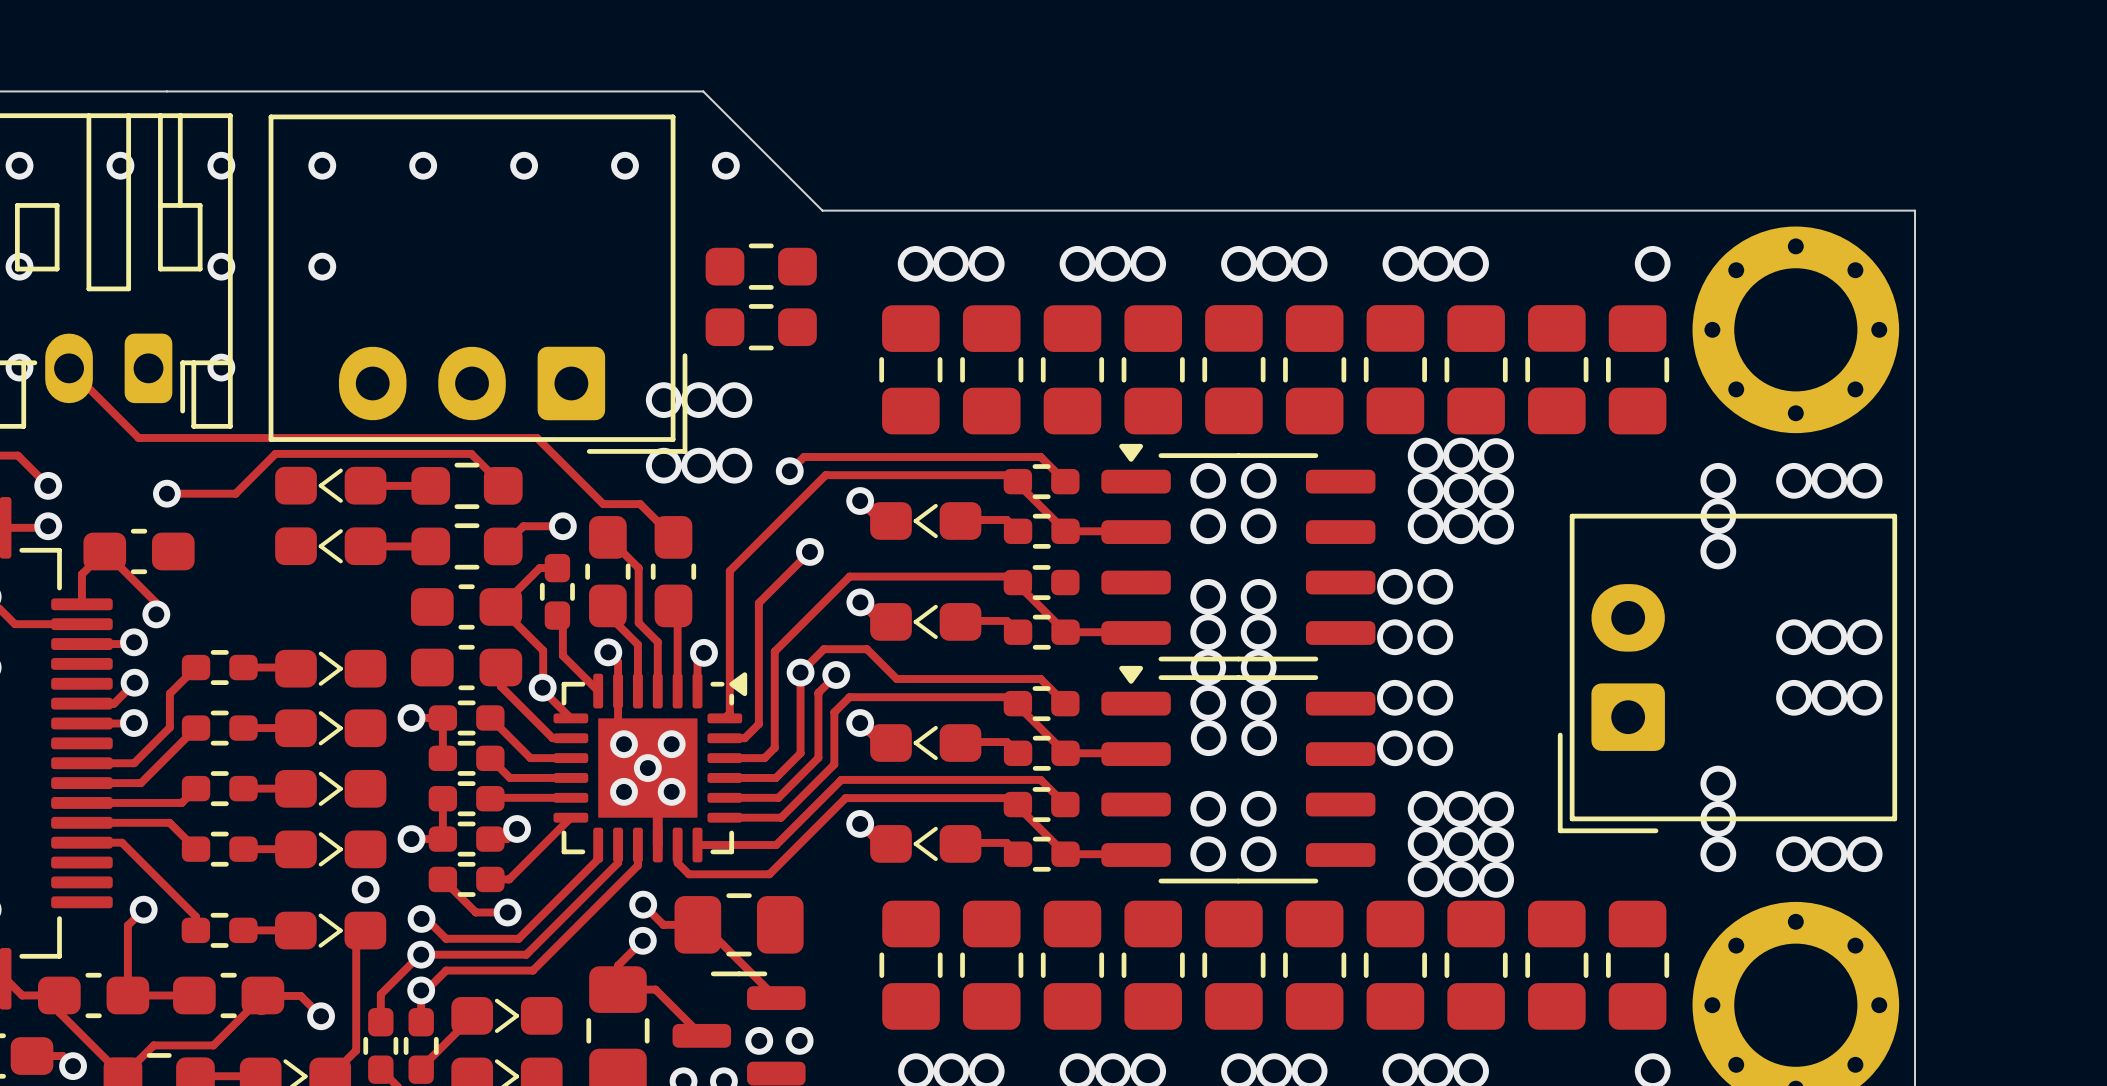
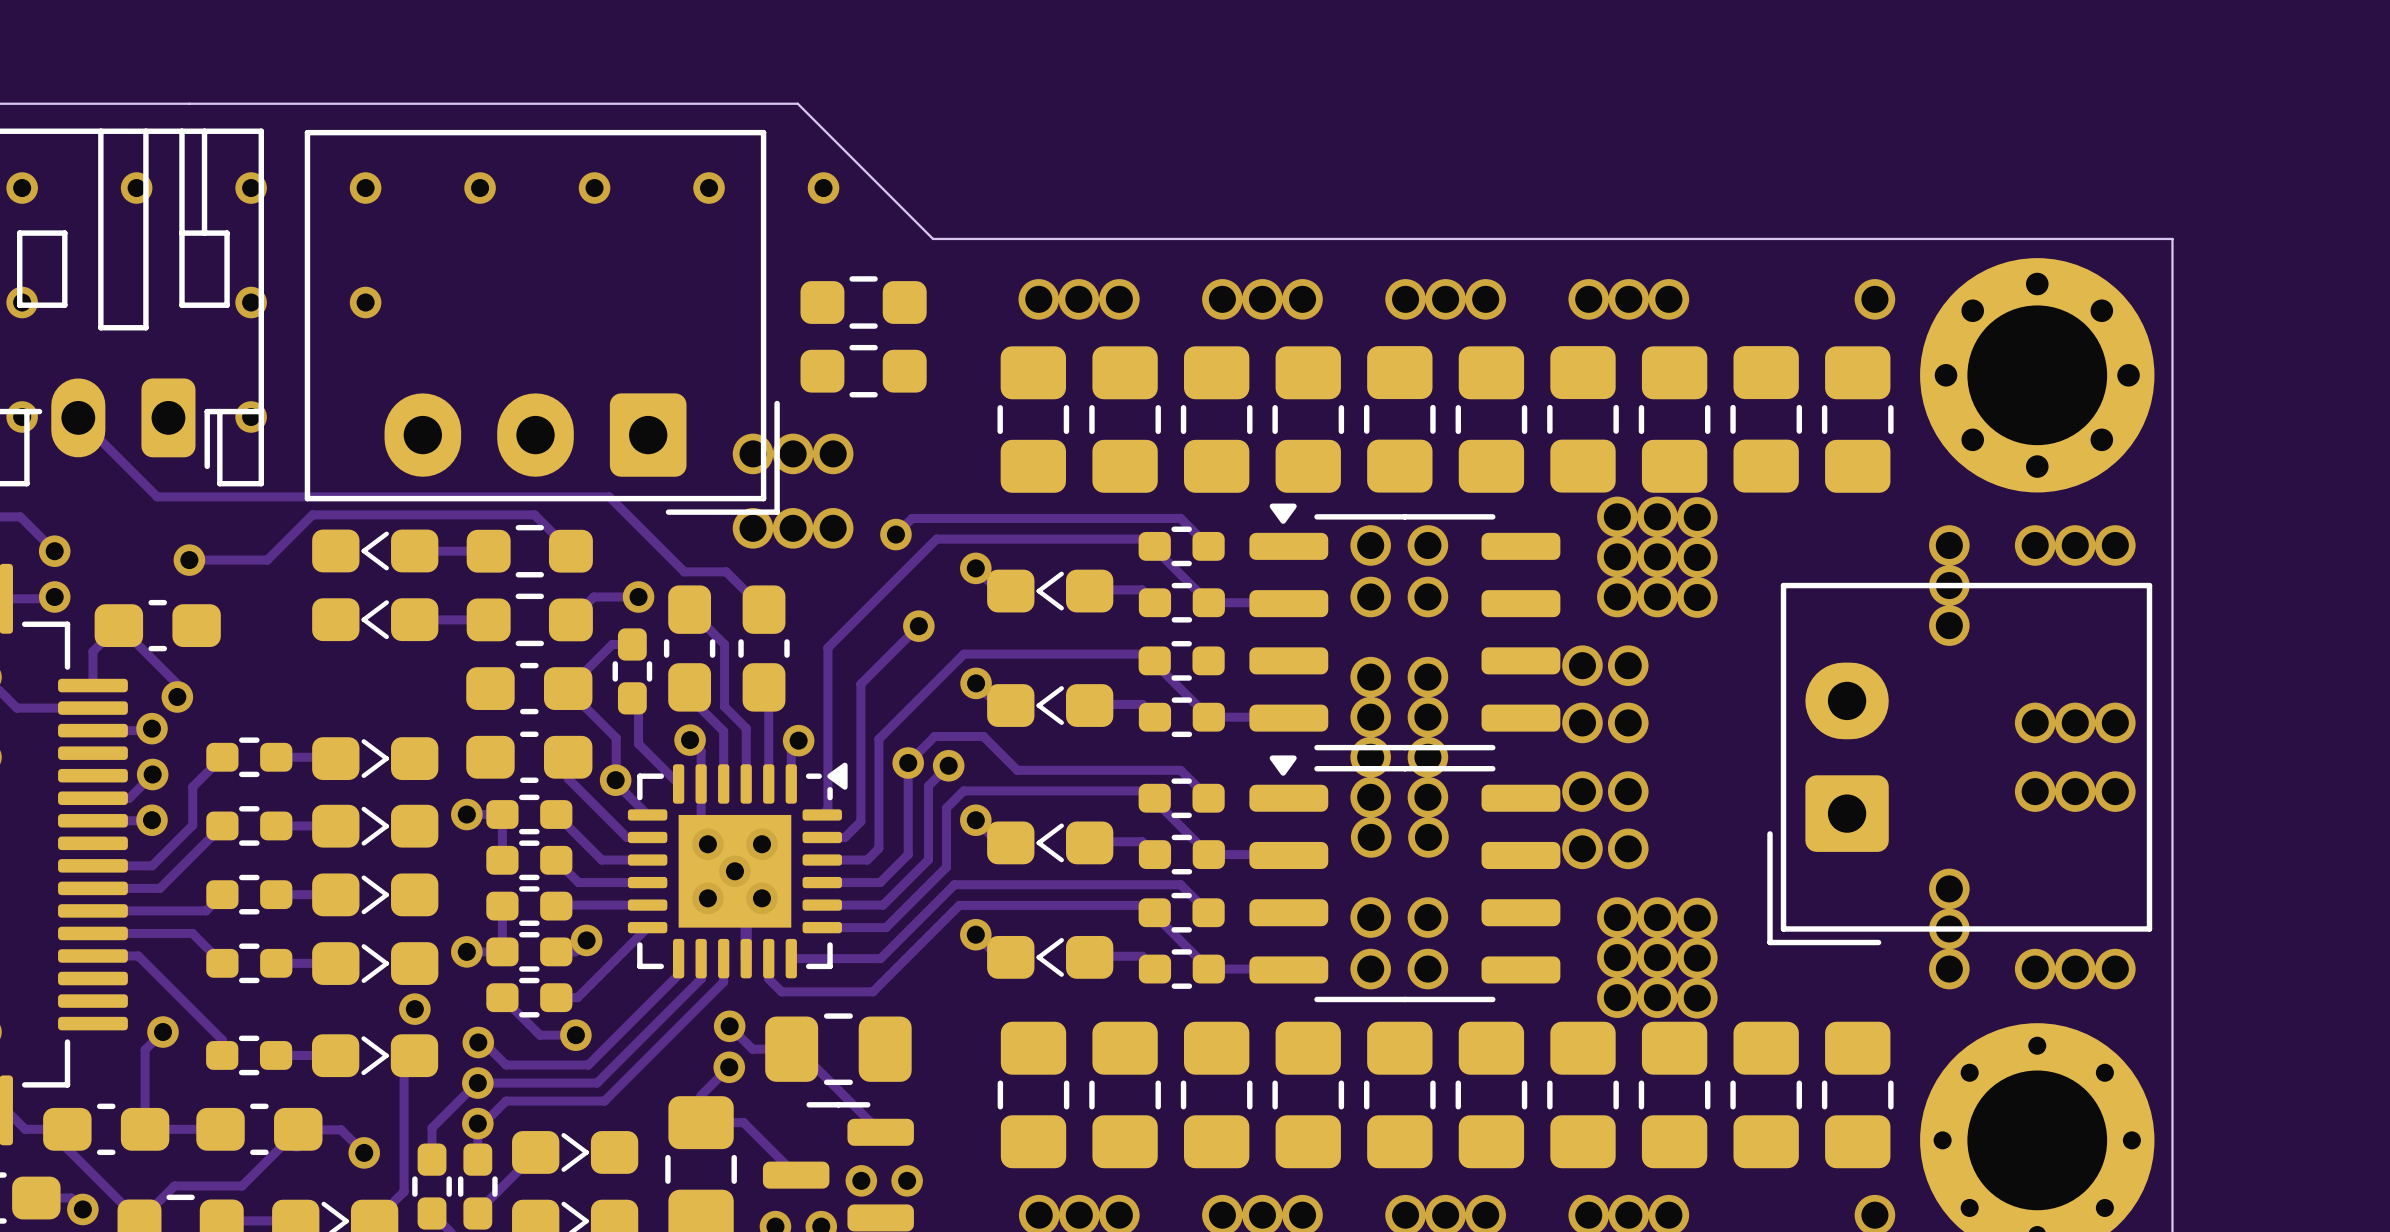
part footprint: [1692, 226, 1900, 434] -> [1920, 258, 2155, 493]

